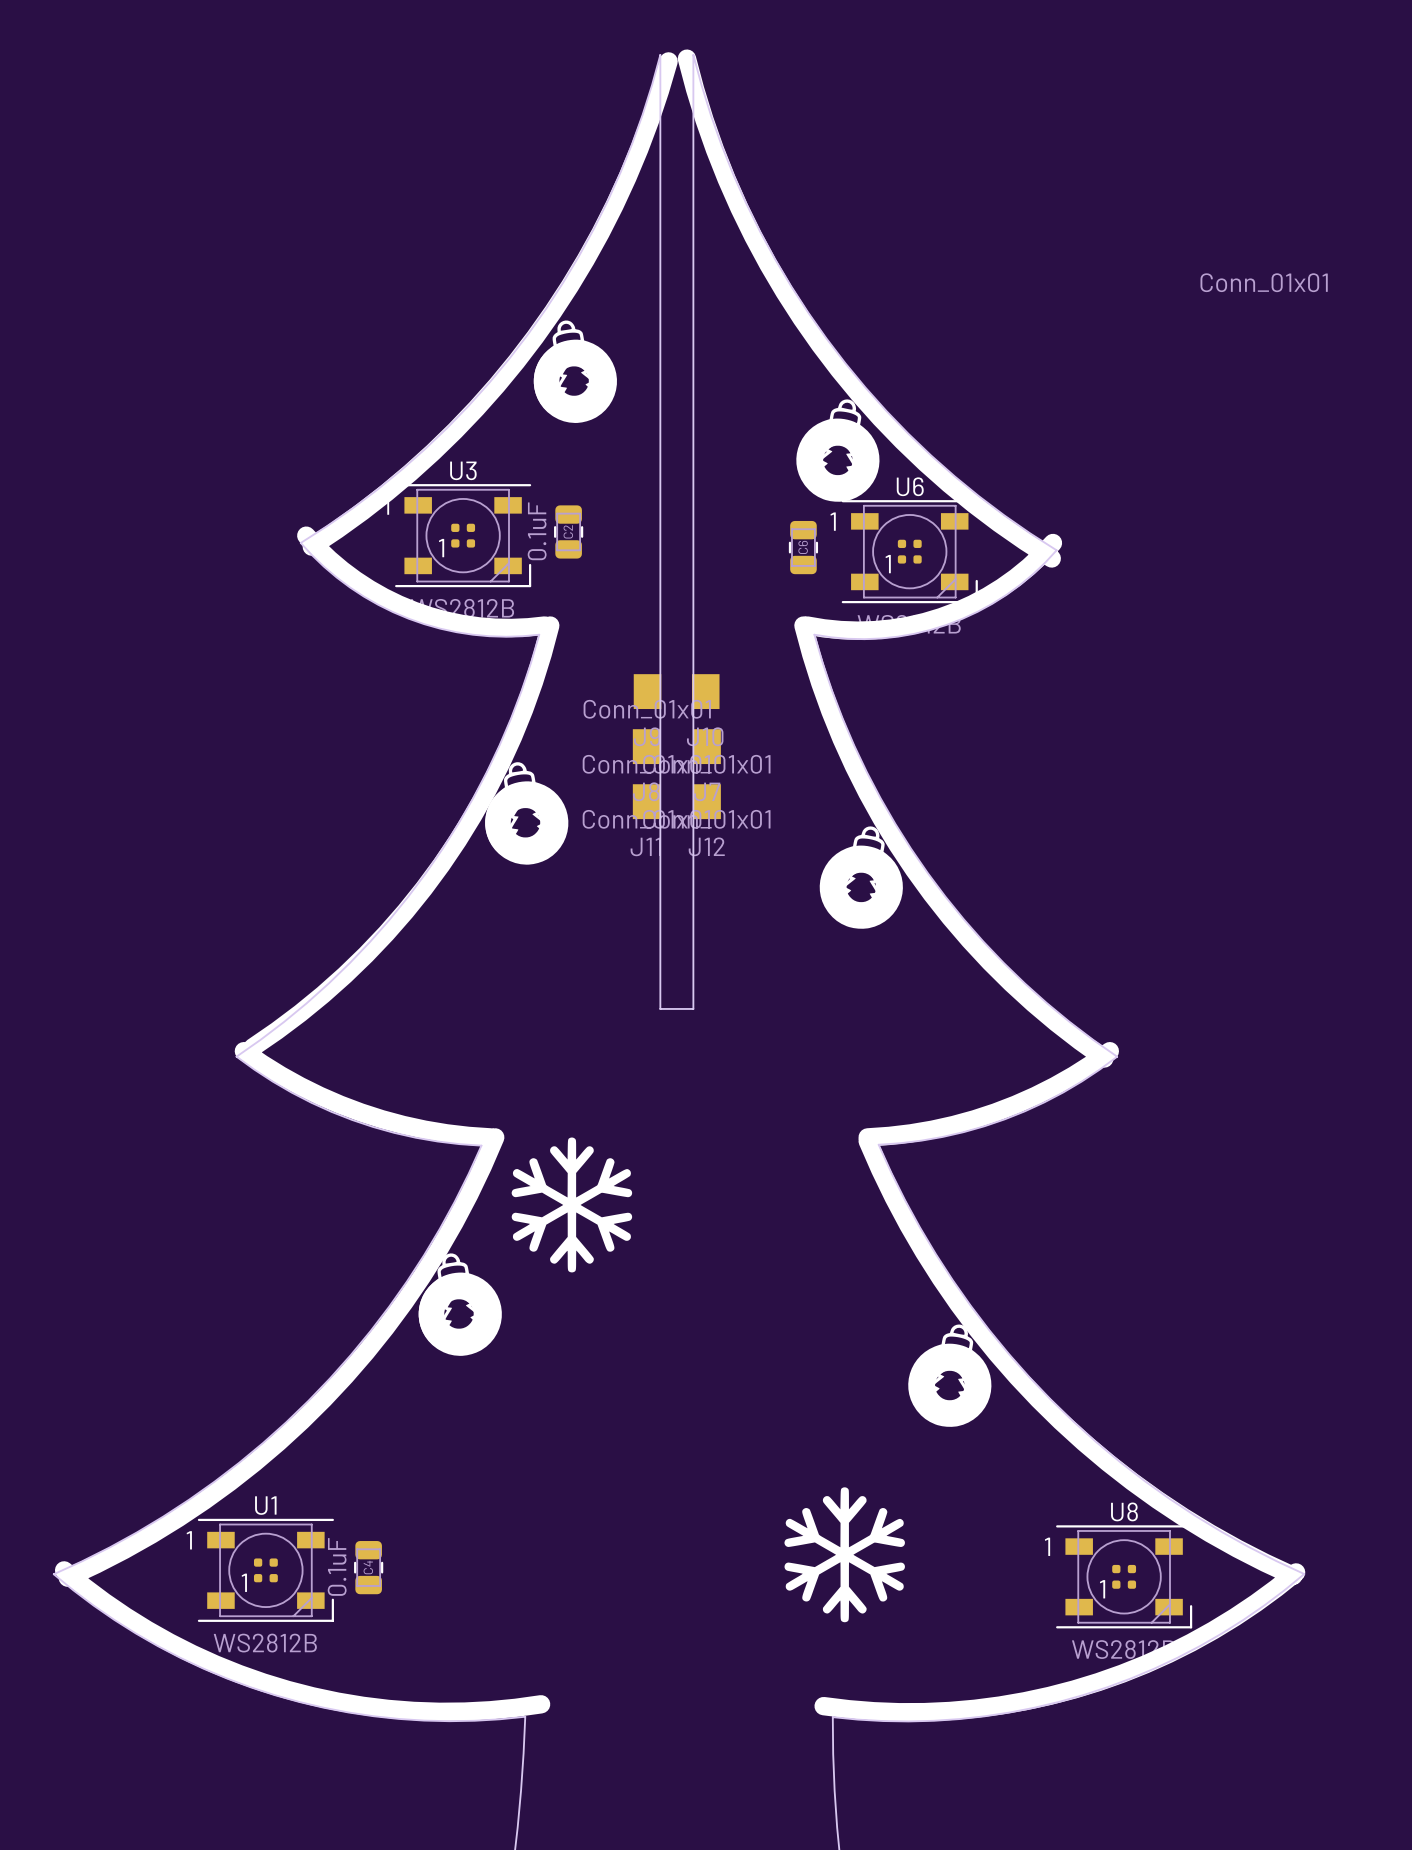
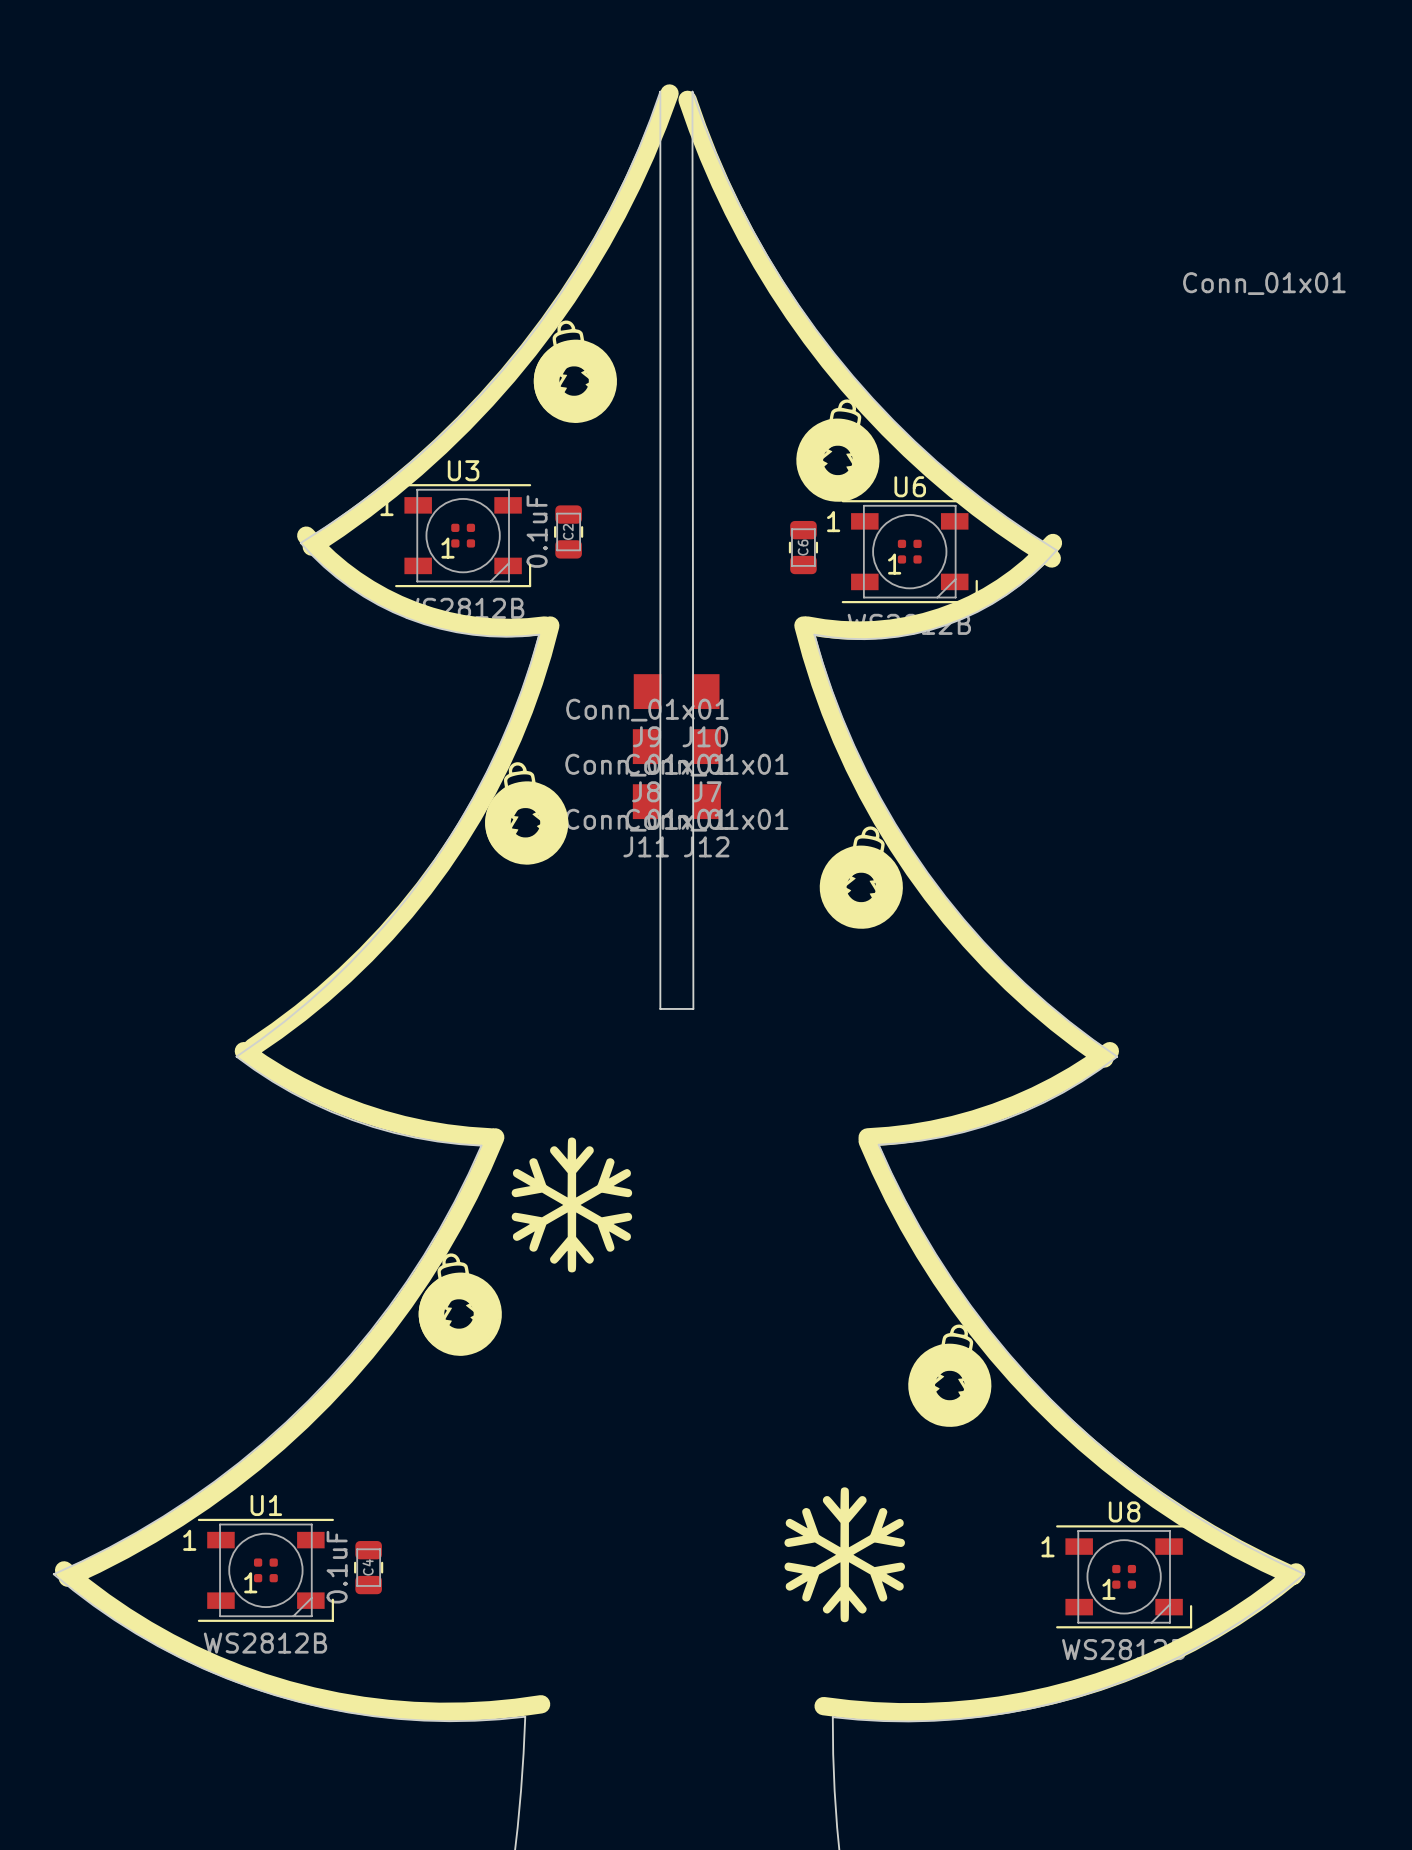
line: (686, 58) (704, 119) (739, 208) (768, 264) (819, 344) (859, 394) (925, 462) (998, 523) (1051, 558) -> (687, 99) (720, 183) (746, 236) (777, 288) (829, 361) (888, 428) (931, 469) (1001, 525) (1051, 558)
line: (668, 61) (650, 120) (614, 205) (569, 286) (535, 337) (476, 408) (433, 452) (386, 492) (311, 546) -> (669, 93) (632, 184) (601, 241) (567, 297) (528, 350) (486, 399) (416, 468) (365, 509) (311, 546)
board edge: (660, 91) (660, 54) (632, 143) (607, 200) (563, 282) (509, 358) (468, 405) (401, 470) (352, 508) (300, 542) -> (660, 91) (639, 146) (601, 226) (555, 301) (520, 348) (481, 393) (418, 455) (349, 510) (300, 542)
board edge: (1056, 550) (979, 496) (931, 455) (865, 387) (826, 338) (775, 259) (746, 203) (710, 115) (693, 54) (693, 1008) -> (1056, 550) (982, 499) (936, 461) (893, 420) (834, 353) (782, 280) (751, 228) (725, 175) (692, 91) (693, 1008)

